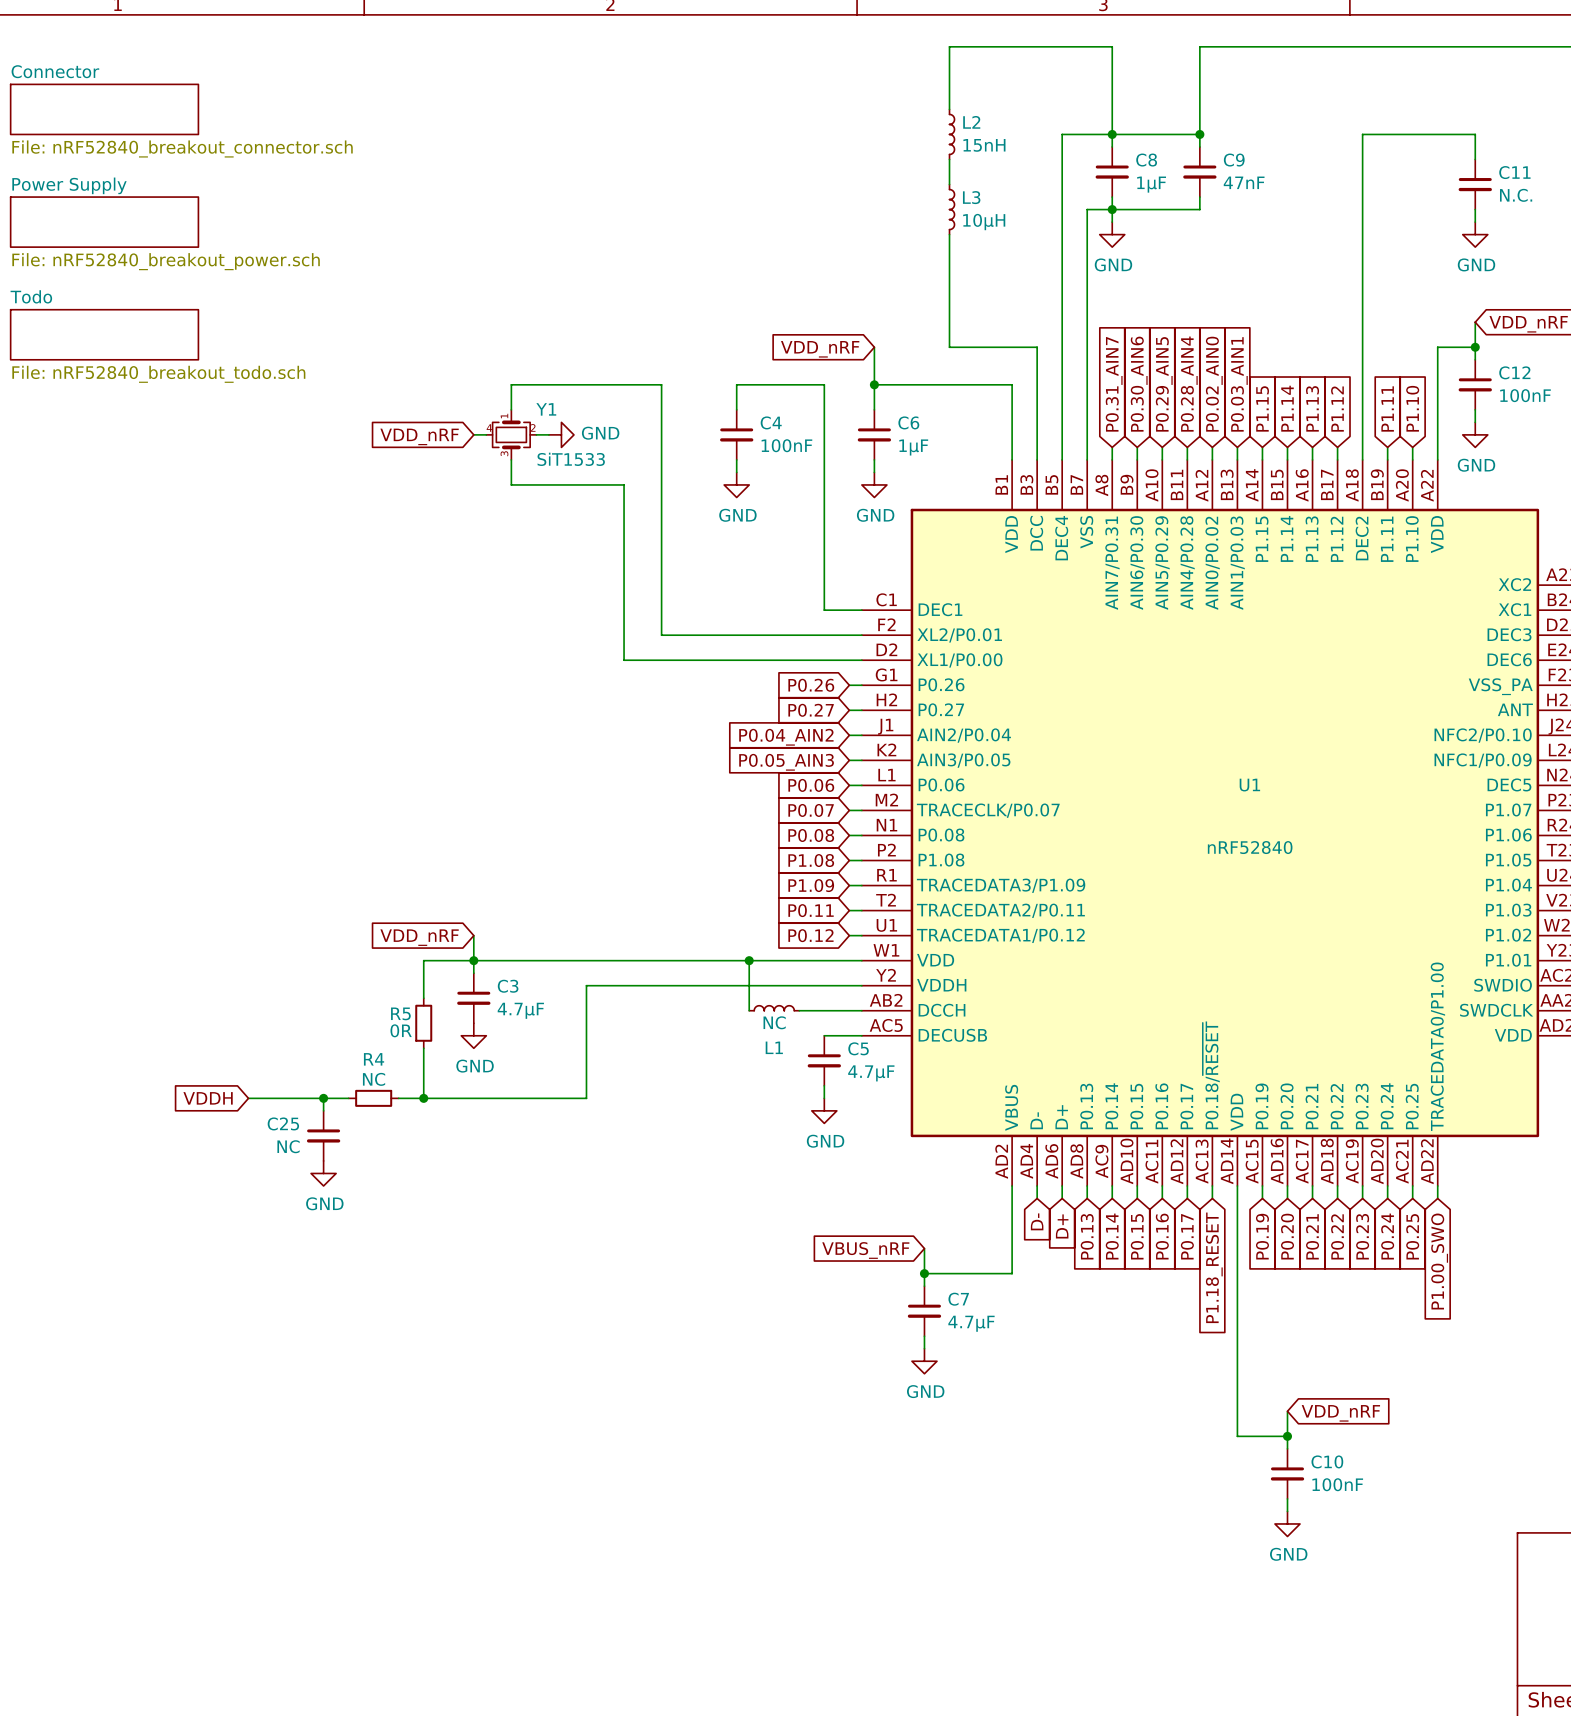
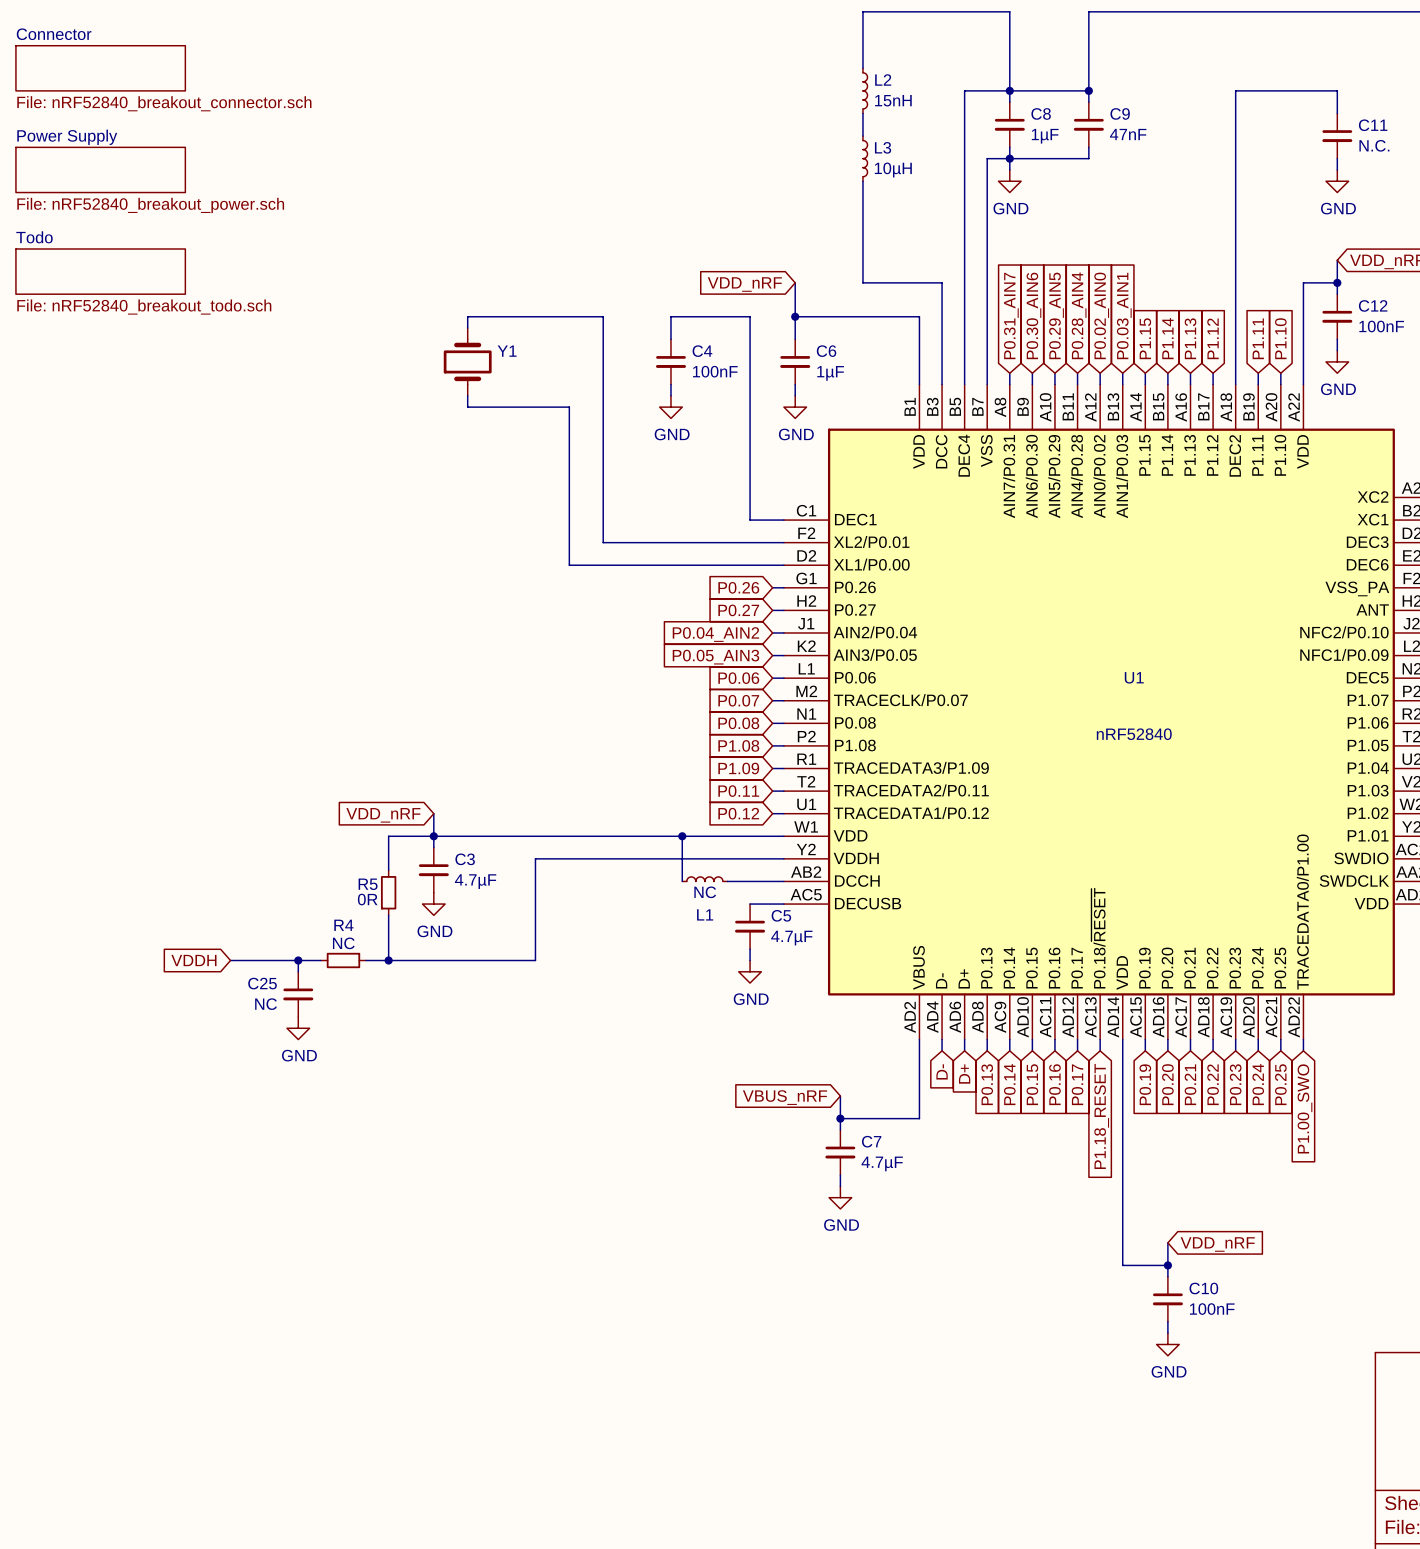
Y1 symbol: [486, 409, 537, 460] -> [443, 328, 492, 396]
wire: (473, 434) (486, 434) -> none
wire: (536, 434) (548, 434) -> none
power symbol: GND (561, 434) -> none
global label: VDD_nRF (419, 436) -> none
Y1 value: SiT1533 (571, 459) -> none

